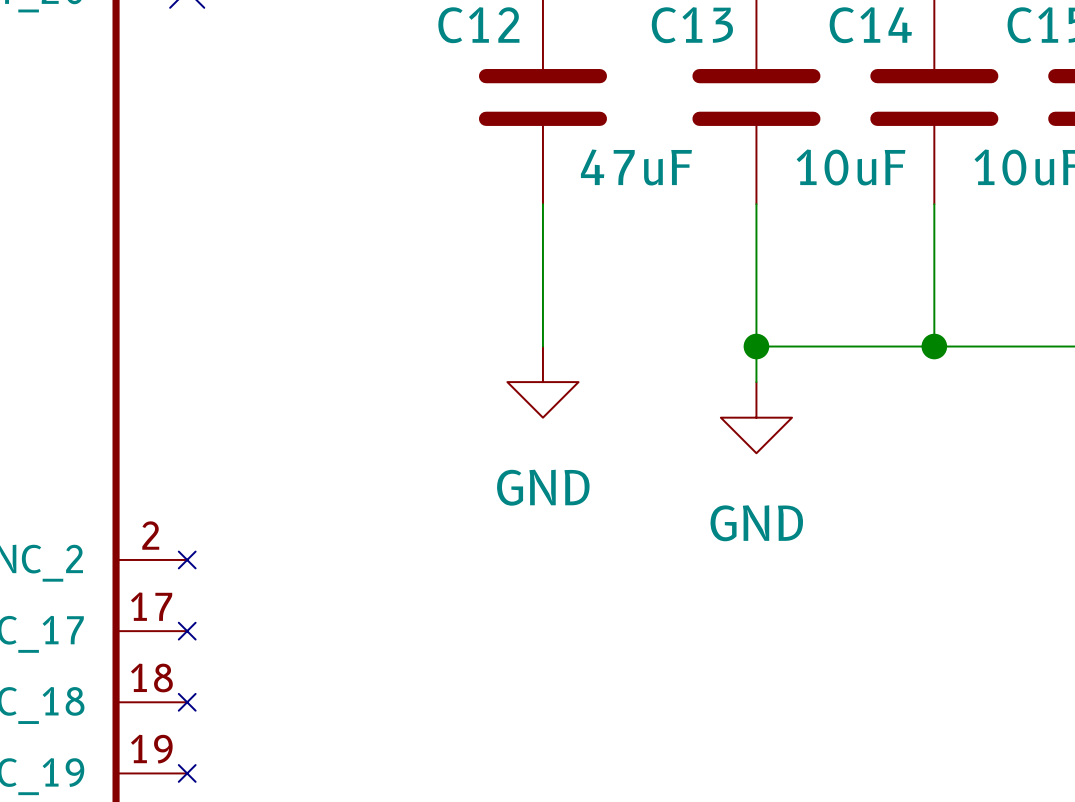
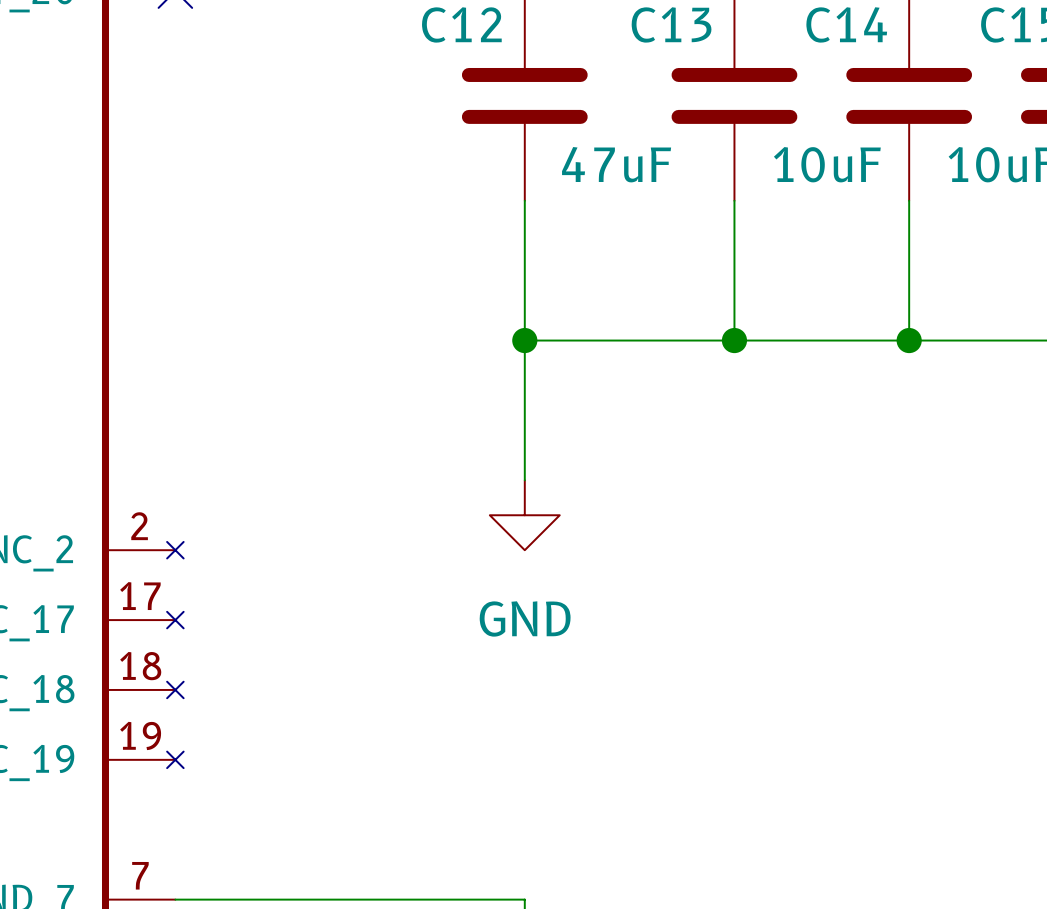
junction: none -> (524, 340)
wire: (756, 346) (756, 382) -> (734, 340) (524, 340) (524, 480)
power symbol: GND (542, 382) -> none
power symbol: GND (756, 417) -> none
power symbol: none -> GND (524, 515)

